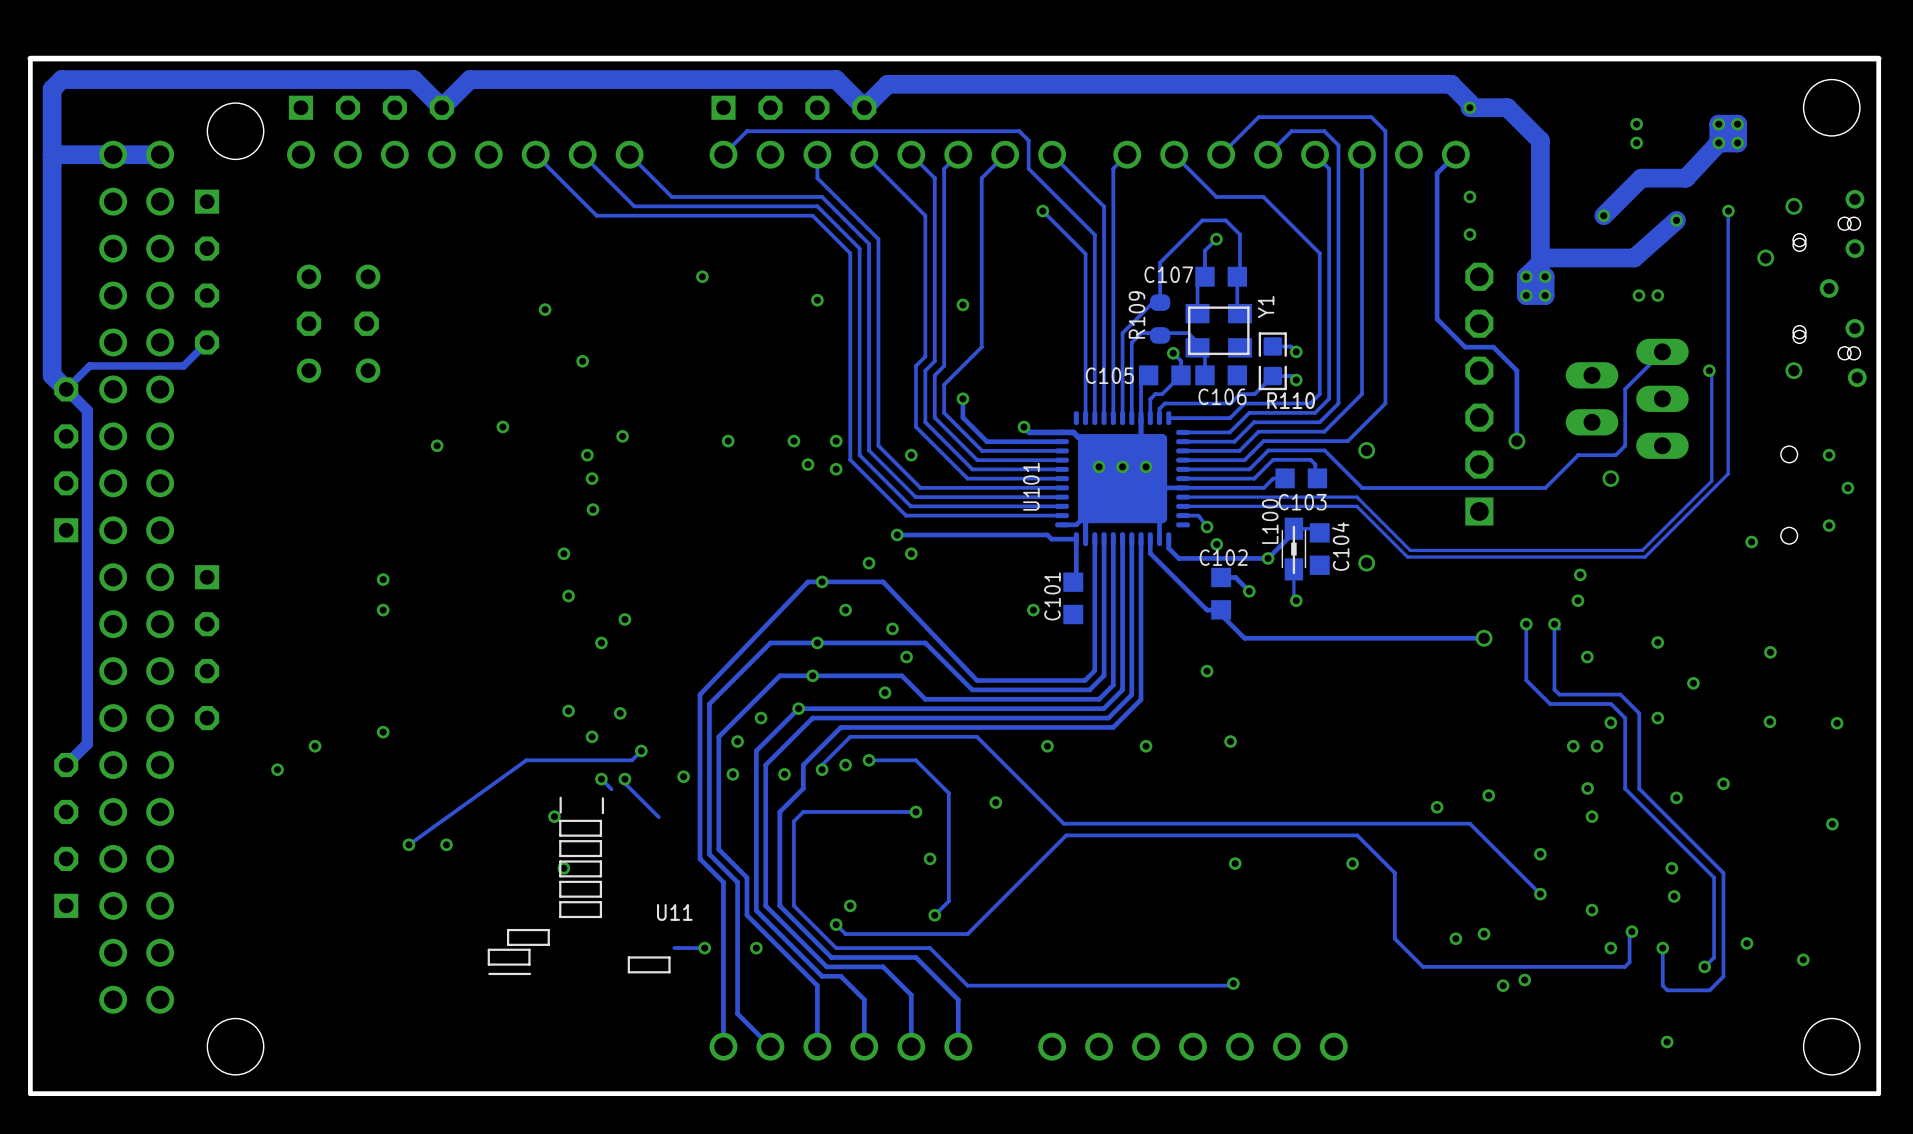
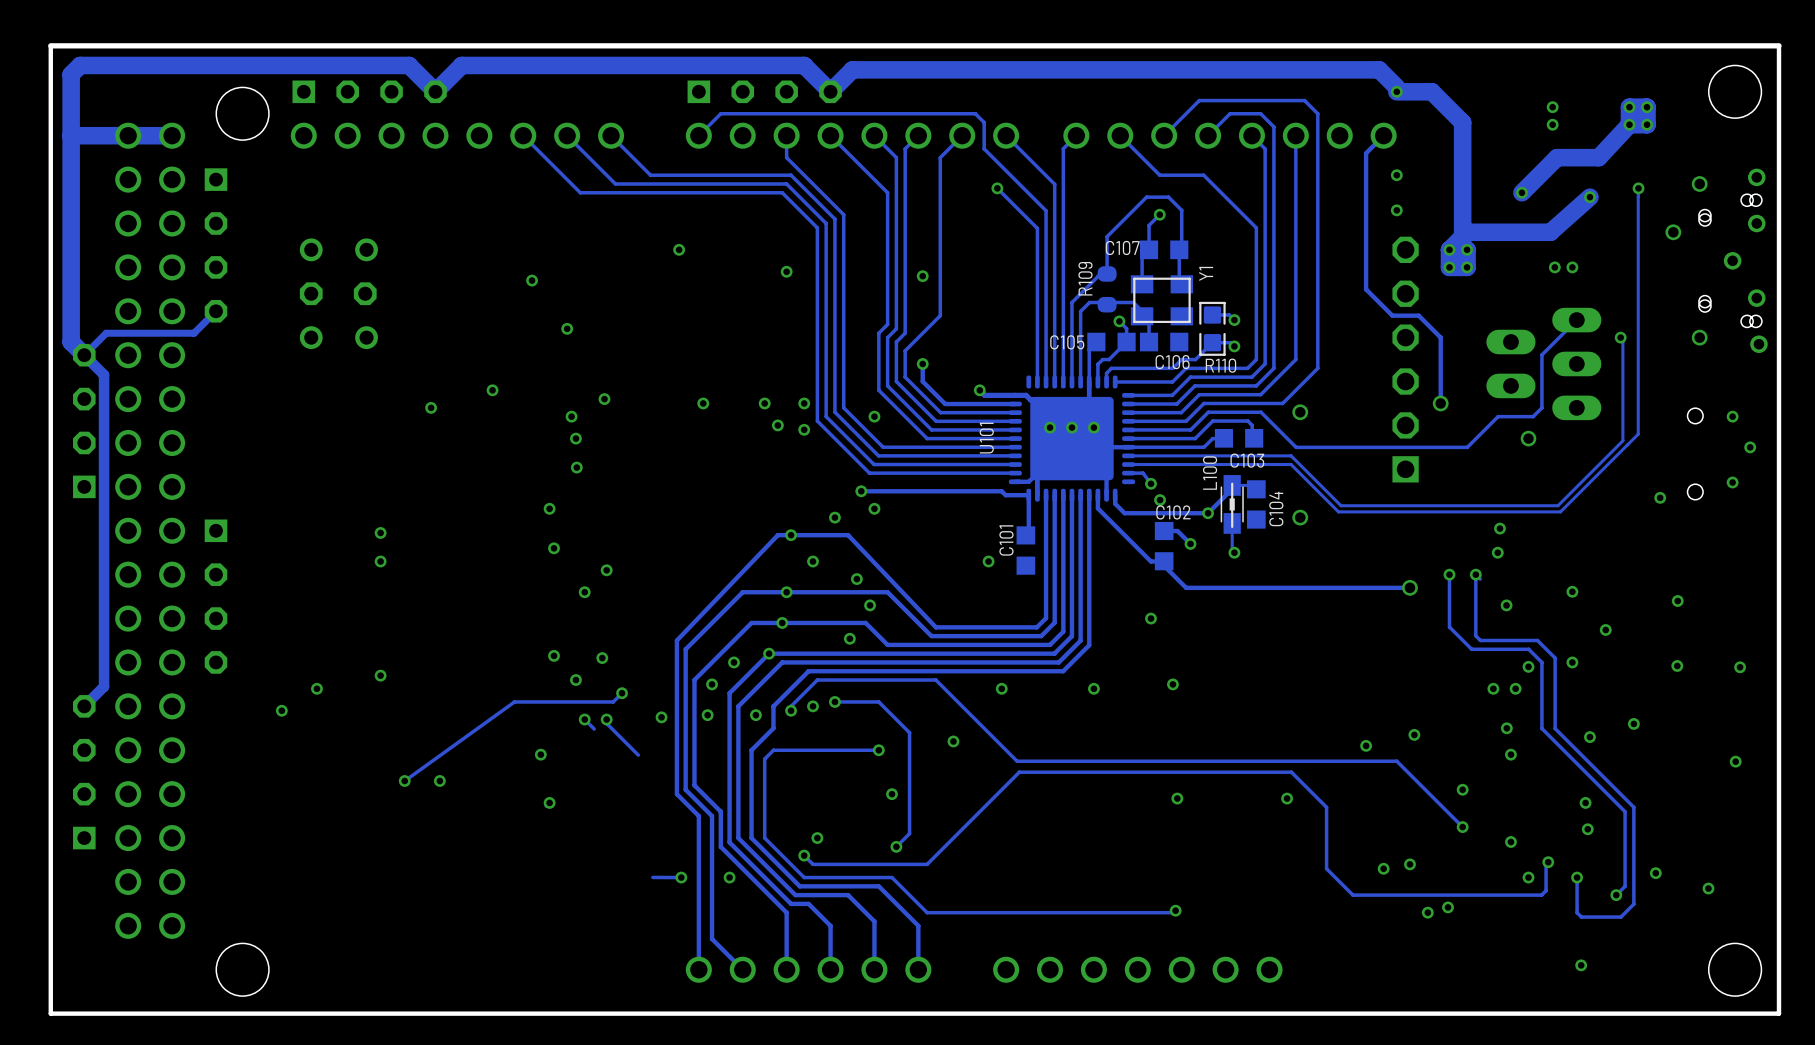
line: (560, 797) (560, 812) -> none
line: (602, 798) (602, 813) -> none
line: (600, 820) (600, 835) (560, 835) (560, 820) (600, 820) -> none
line: (600, 841) (600, 855) (560, 855) (560, 841) (600, 841) -> none
line: (600, 861) (600, 876) (560, 876) (560, 861) (600, 861) -> none
line: (600, 881) (600, 896) (560, 896) (560, 881) (600, 881) -> none
line: (600, 902) (600, 916) (560, 916) (560, 902) (600, 902) -> none
text: U11 (674, 912) -> none
line: (548, 930) (548, 944) (508, 944) (508, 930) (548, 930) -> none
line: (529, 949) (529, 964) (488, 964) (488, 949) (529, 949) -> none
line: (669, 957) (669, 972) (628, 972) (628, 957) (669, 957) -> none
line: (530, 973) (489, 973) -> none

